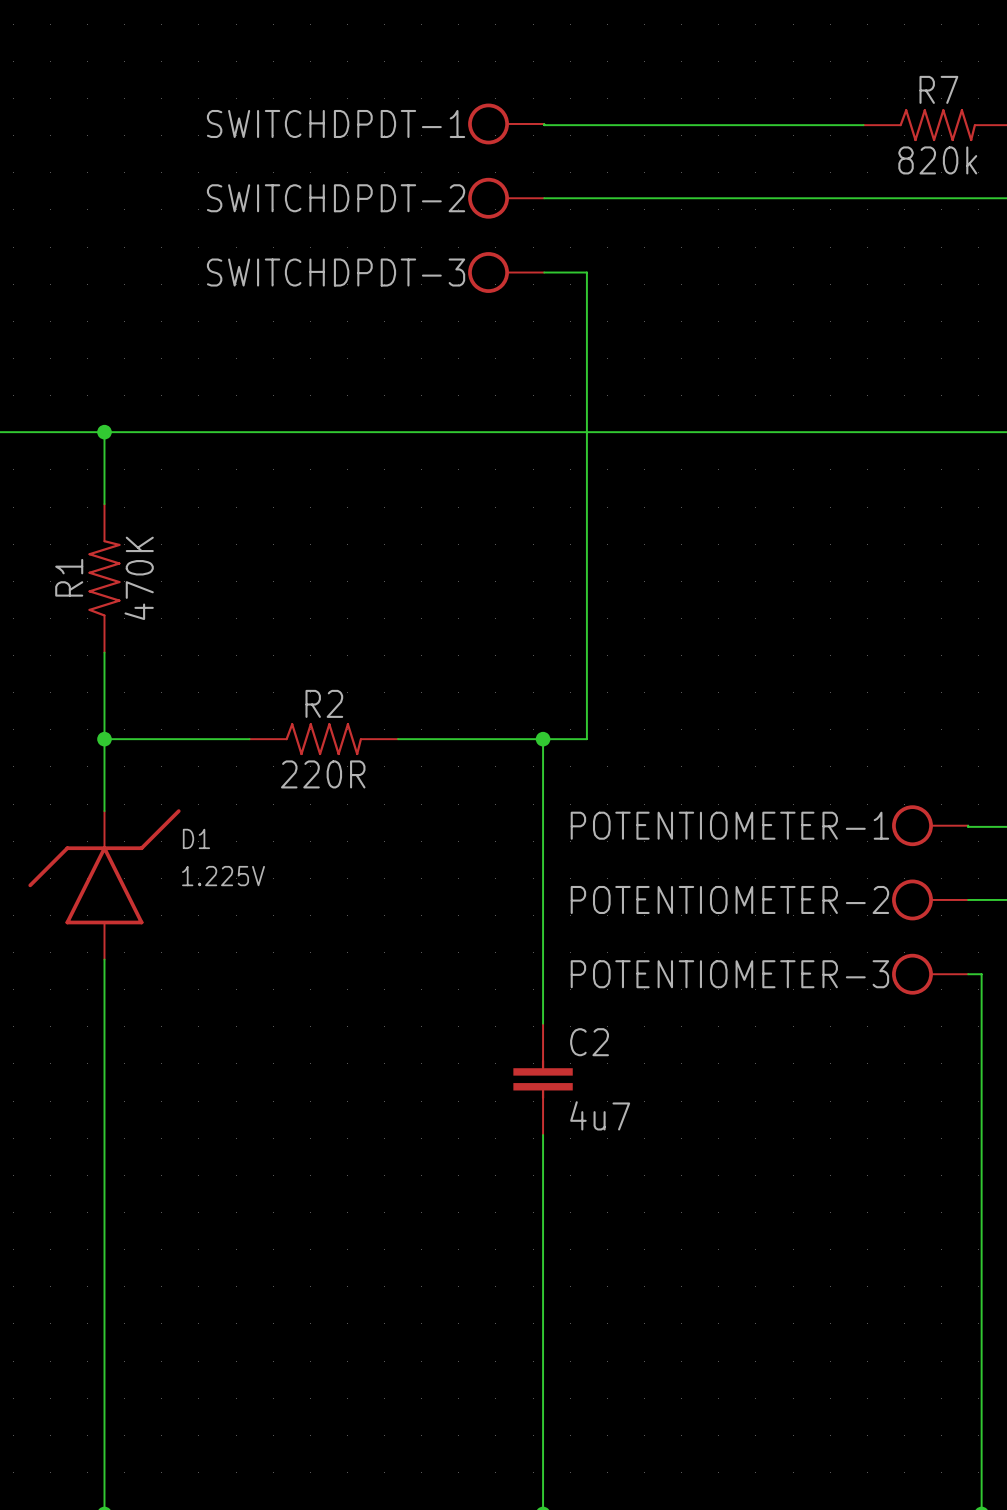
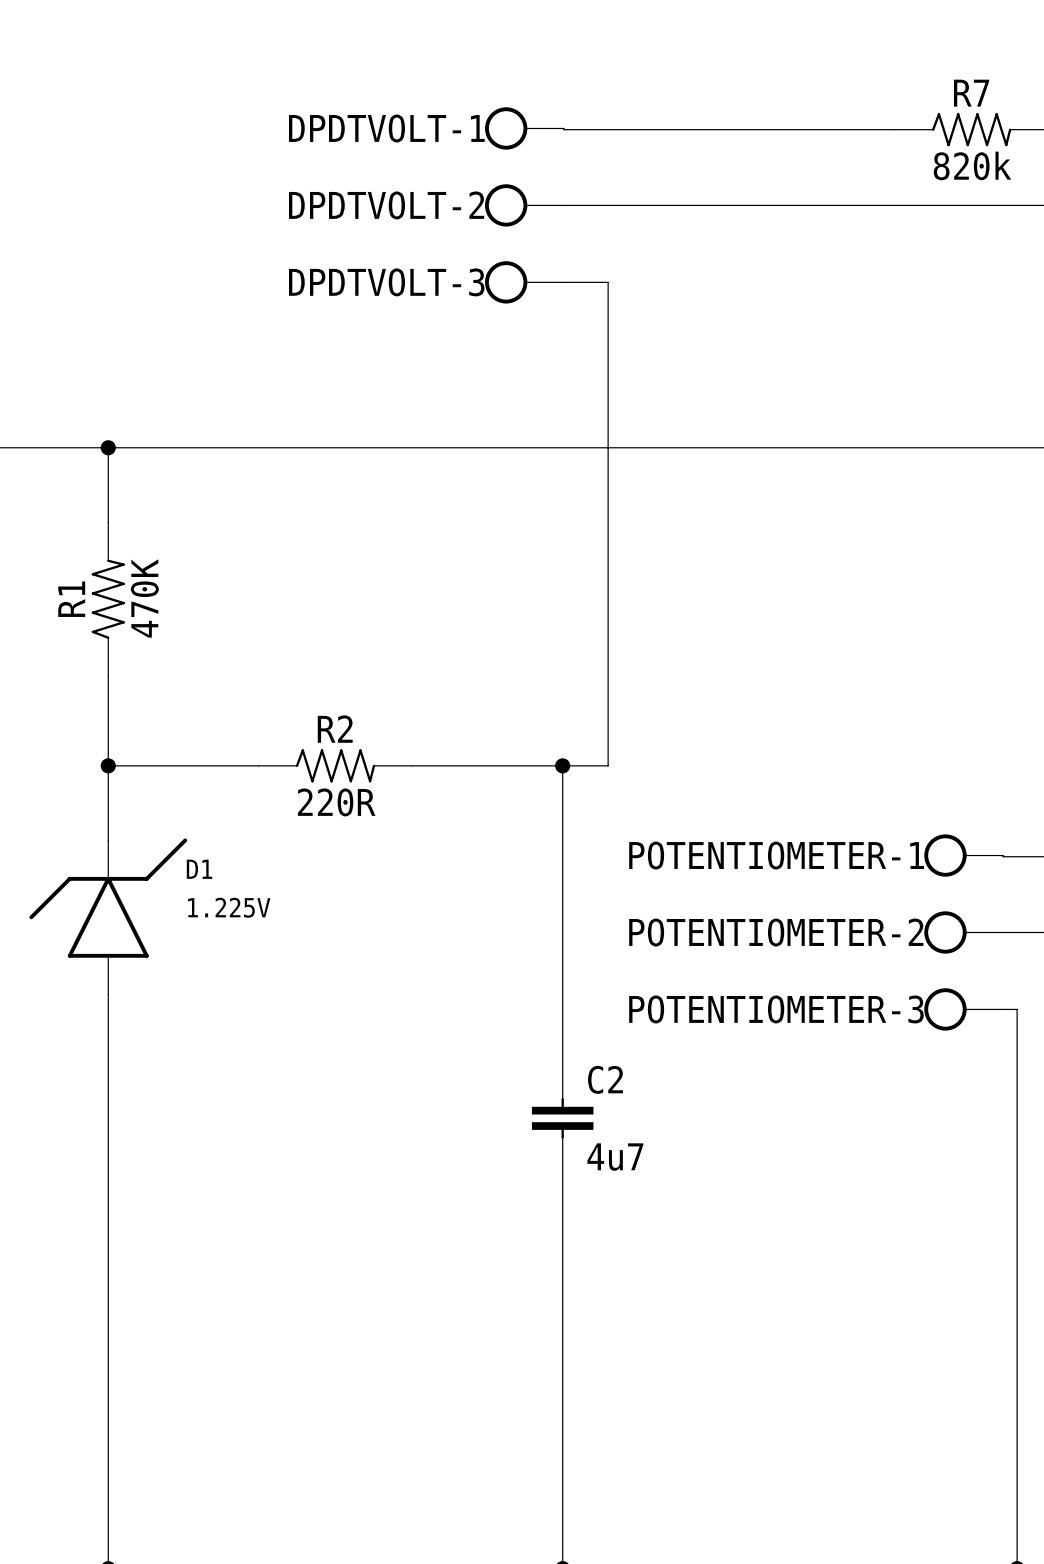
SWITCHDPDT-1 name: SWITCHDPDT-1 (336, 123) -> DPDTVOLT-1 (386, 128)
SWITCHDPDT-2 name: SWITCHDPDT-2 (336, 198) -> DPDTVOLT-2 (386, 205)
SWITCHDPDT-3 name: SWITCHDPDT-3 (336, 272) -> DPDTVOLT-3 (386, 282)

